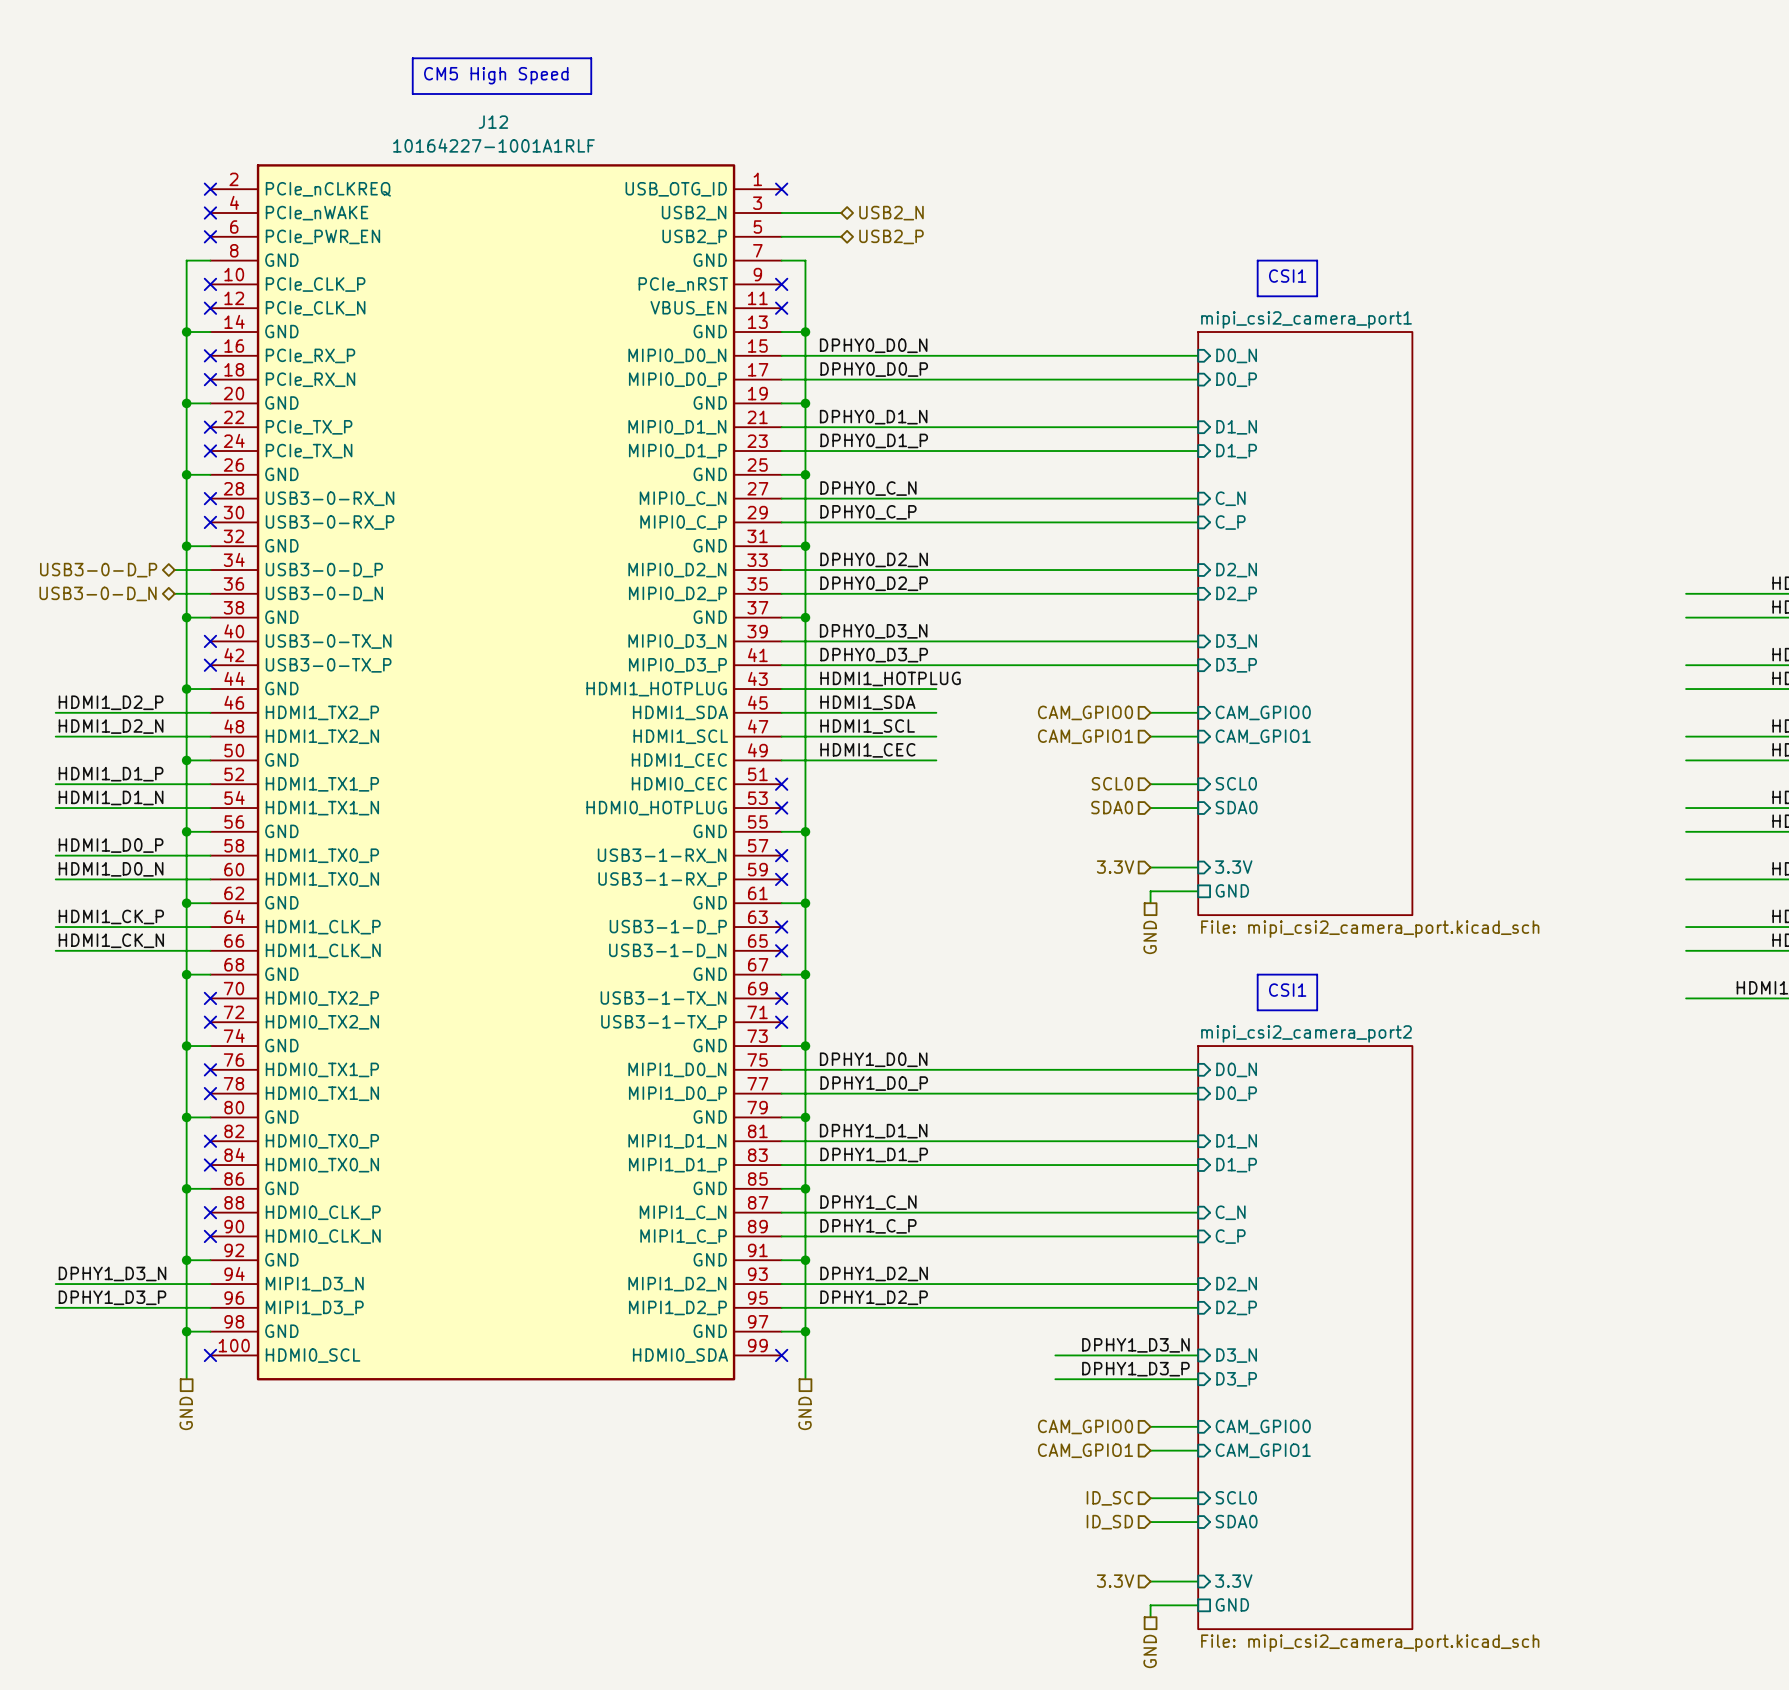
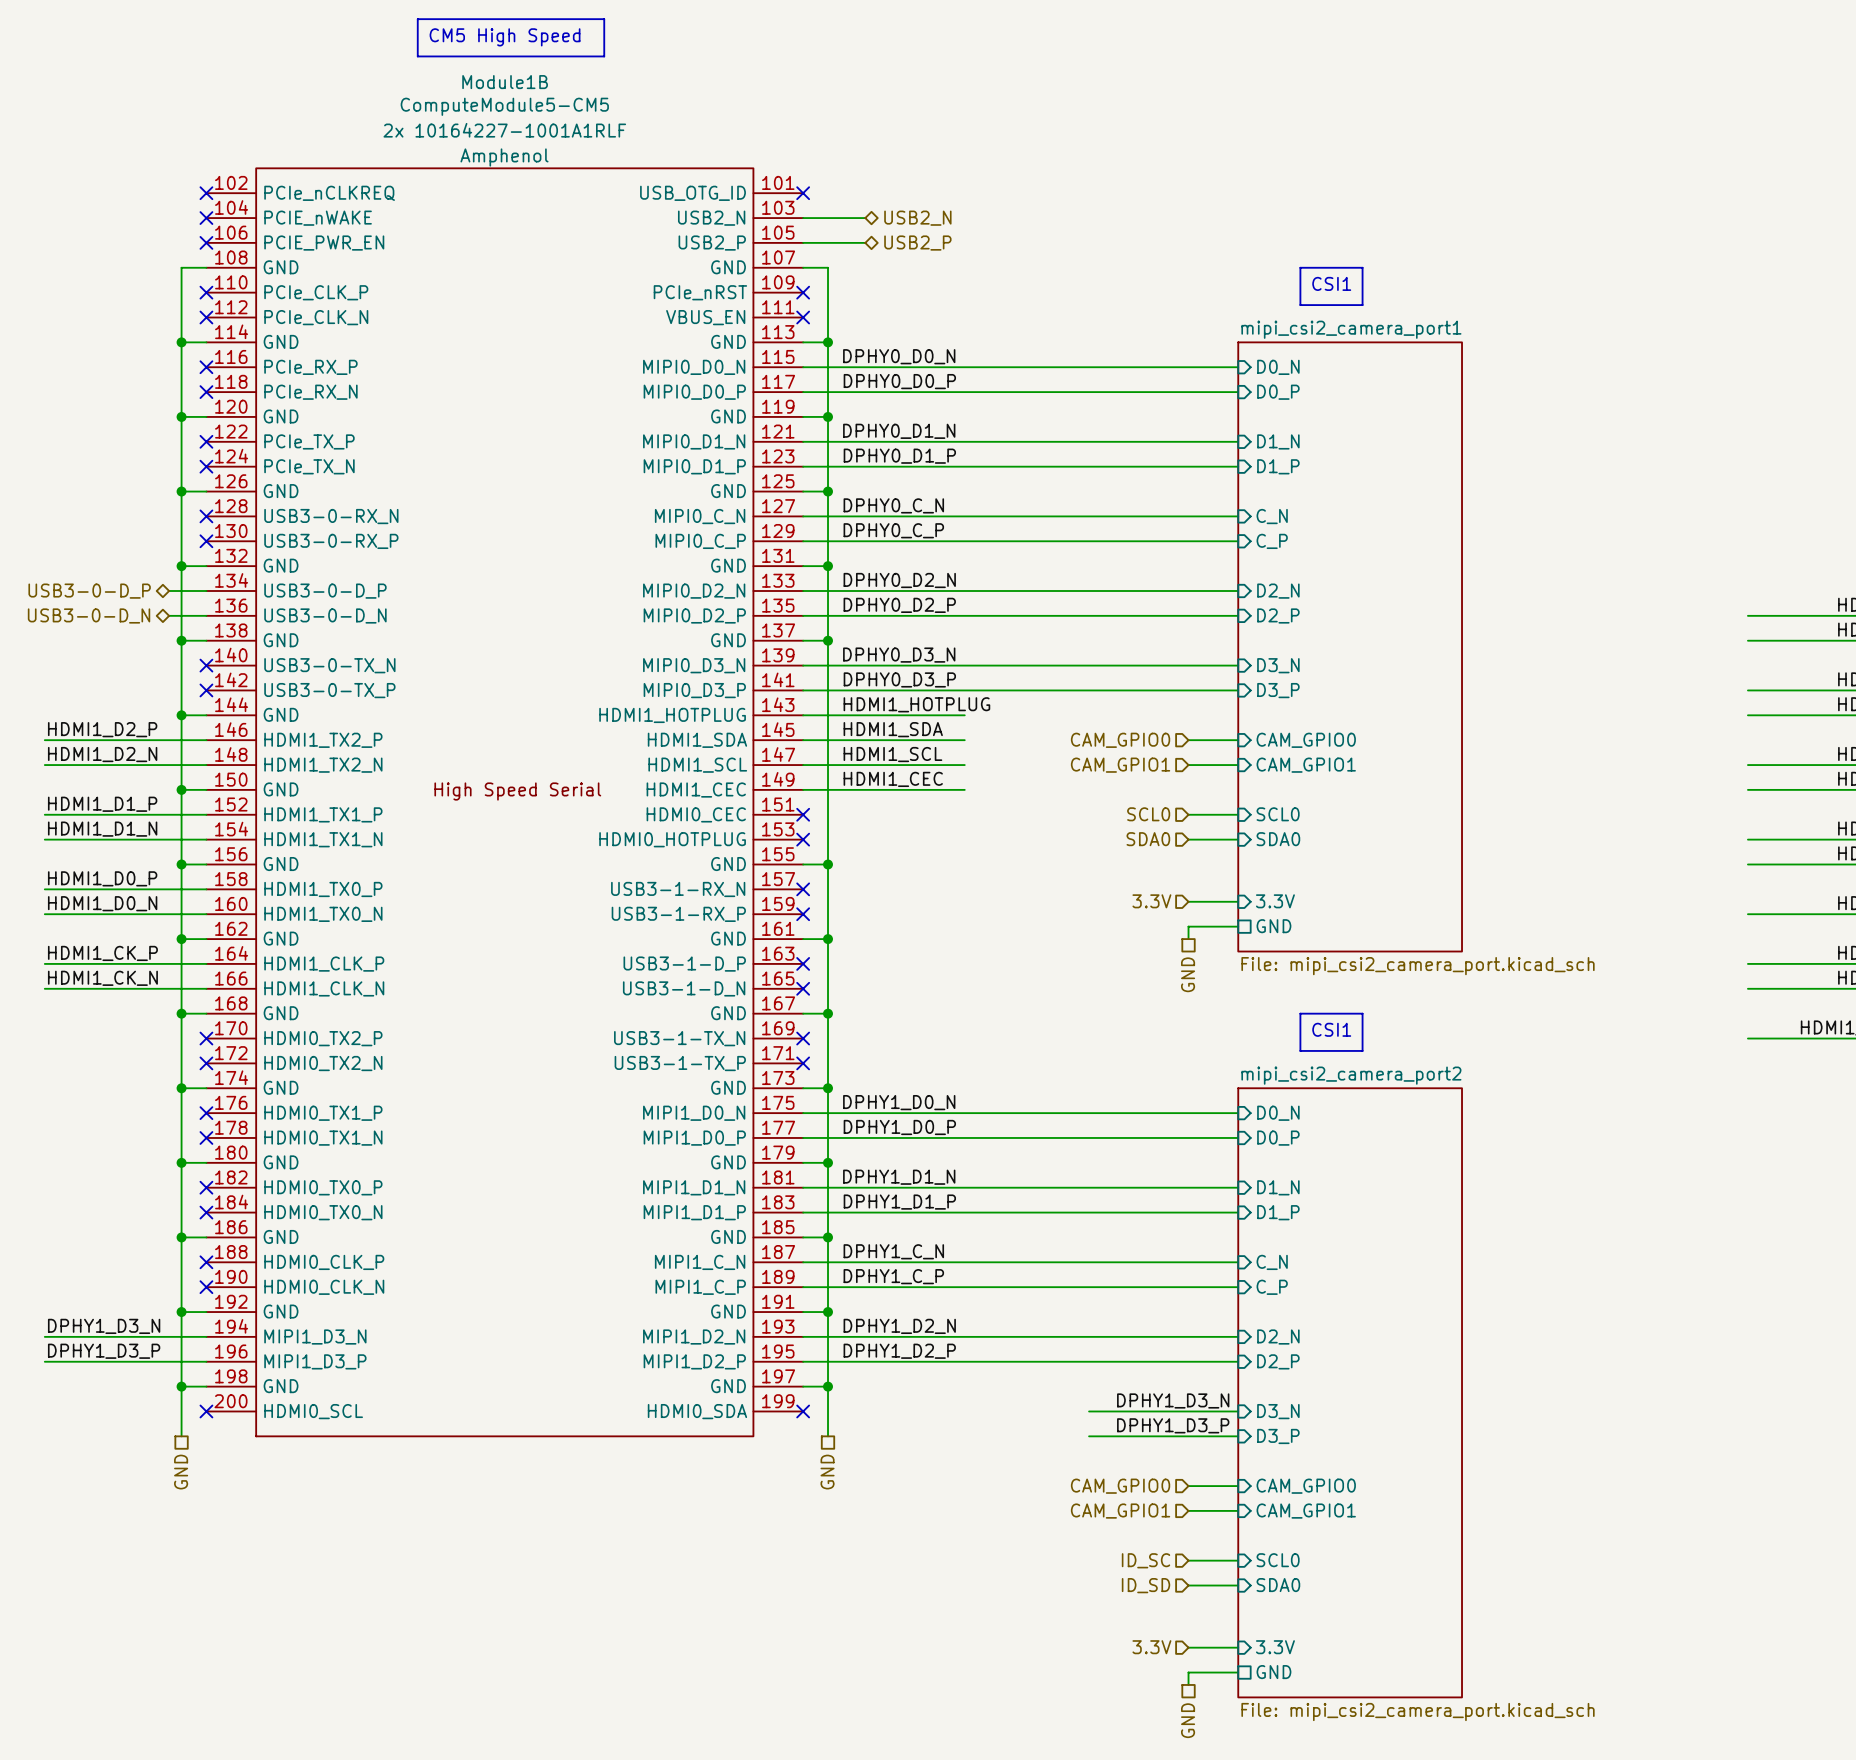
line: (412, 58) (412, 93) (591, 93) (591, 58) -> (417, 56) (417, 19) (604, 19) (604, 56)
text position: CM5 High Speed (496, 75) -> CM5 High Speed (505, 37)
J12: 10164227-1001A1RLF (496, 772) -> none
Module1B: none -> ComputeModule5-CM5 (504, 802)

